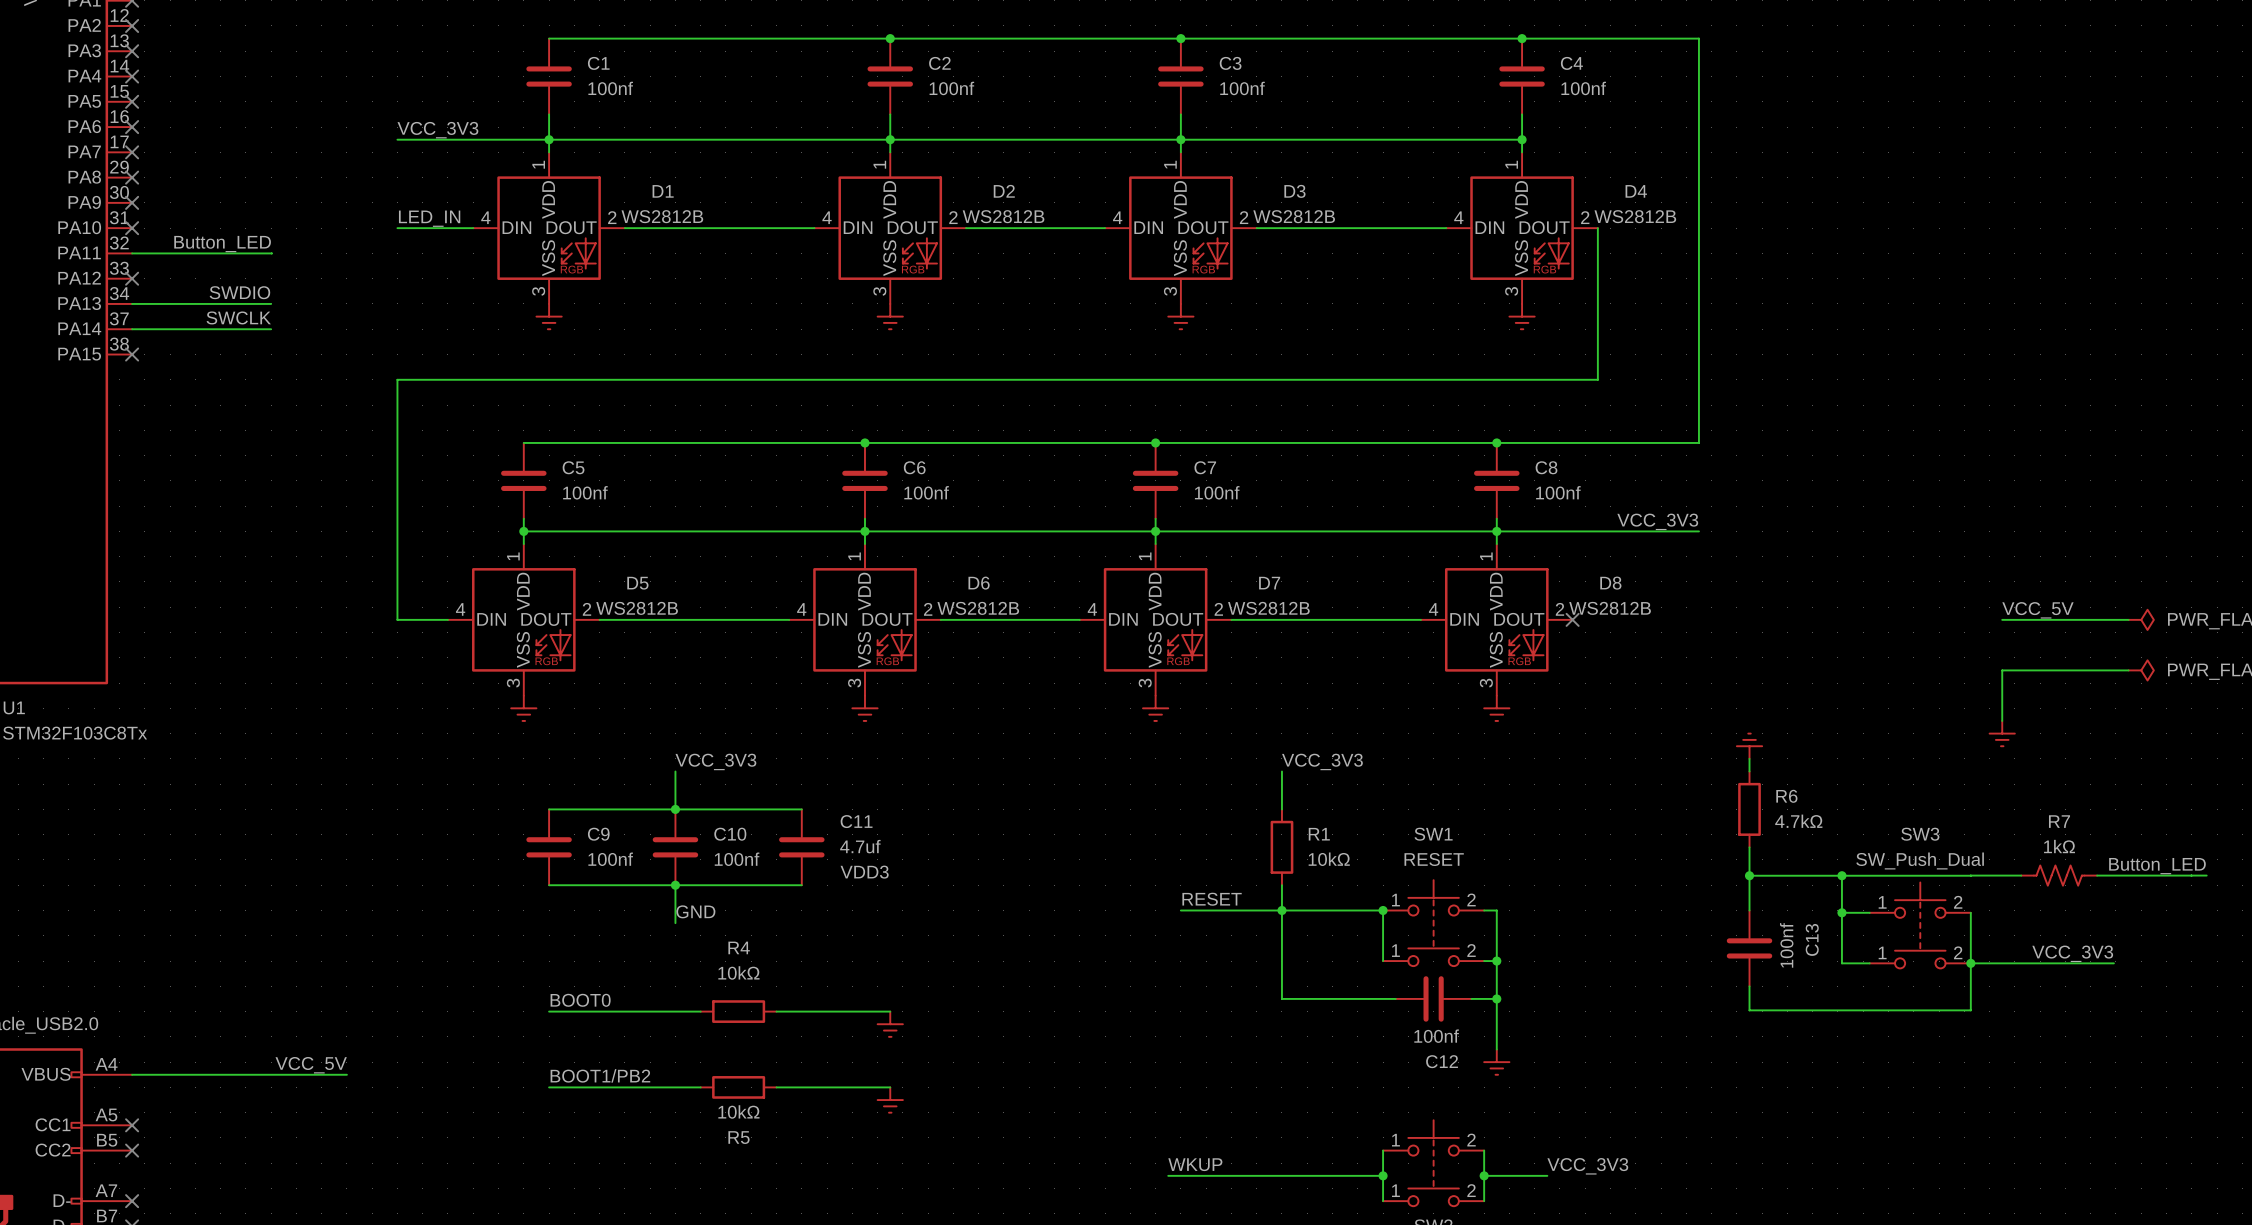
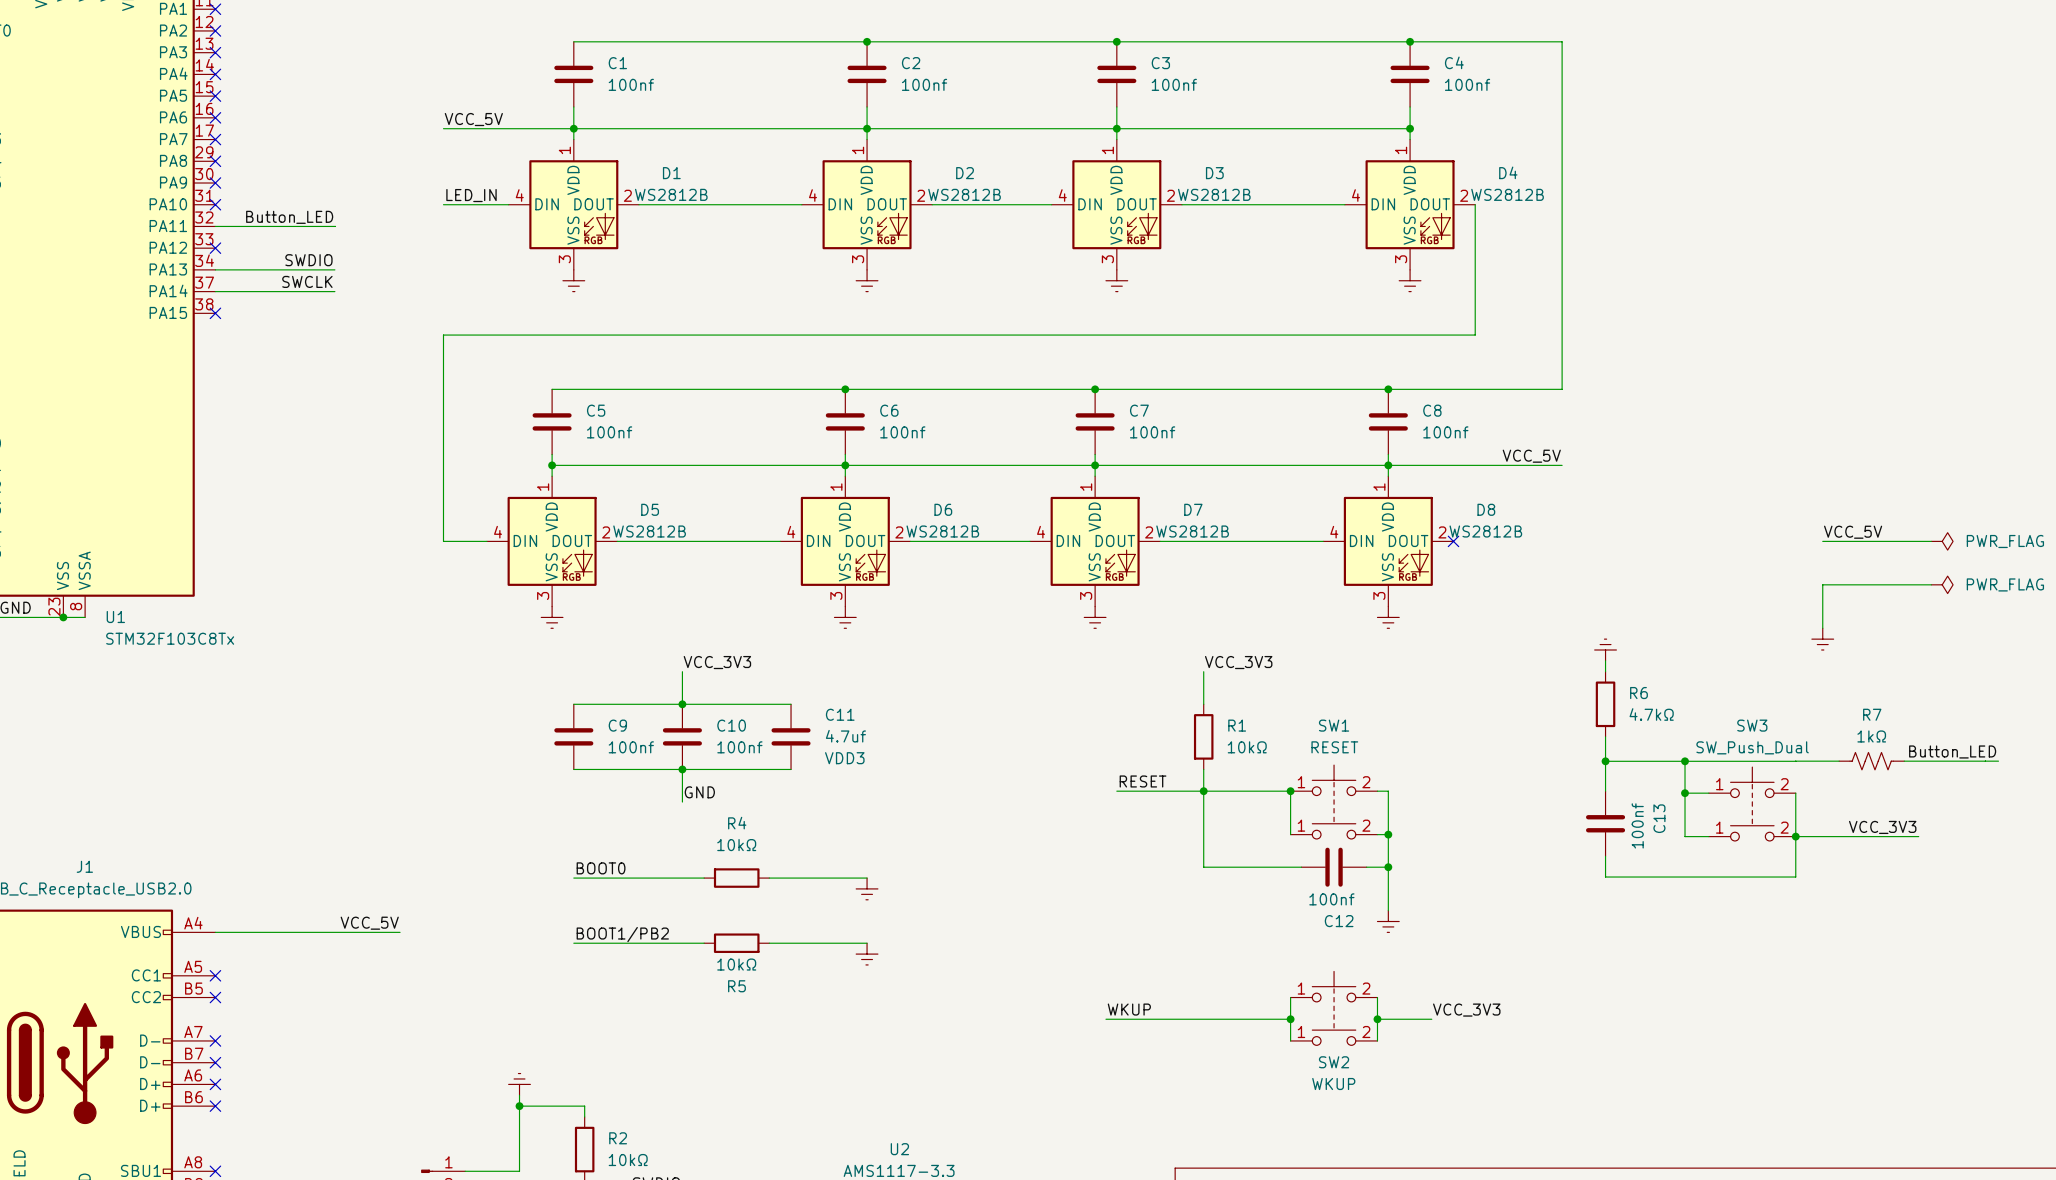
label: VCC_3V3 (437, 130) -> VCC_5V (473, 119)
label: VCC_3V3 (1657, 521) -> VCC_5V (1531, 456)

